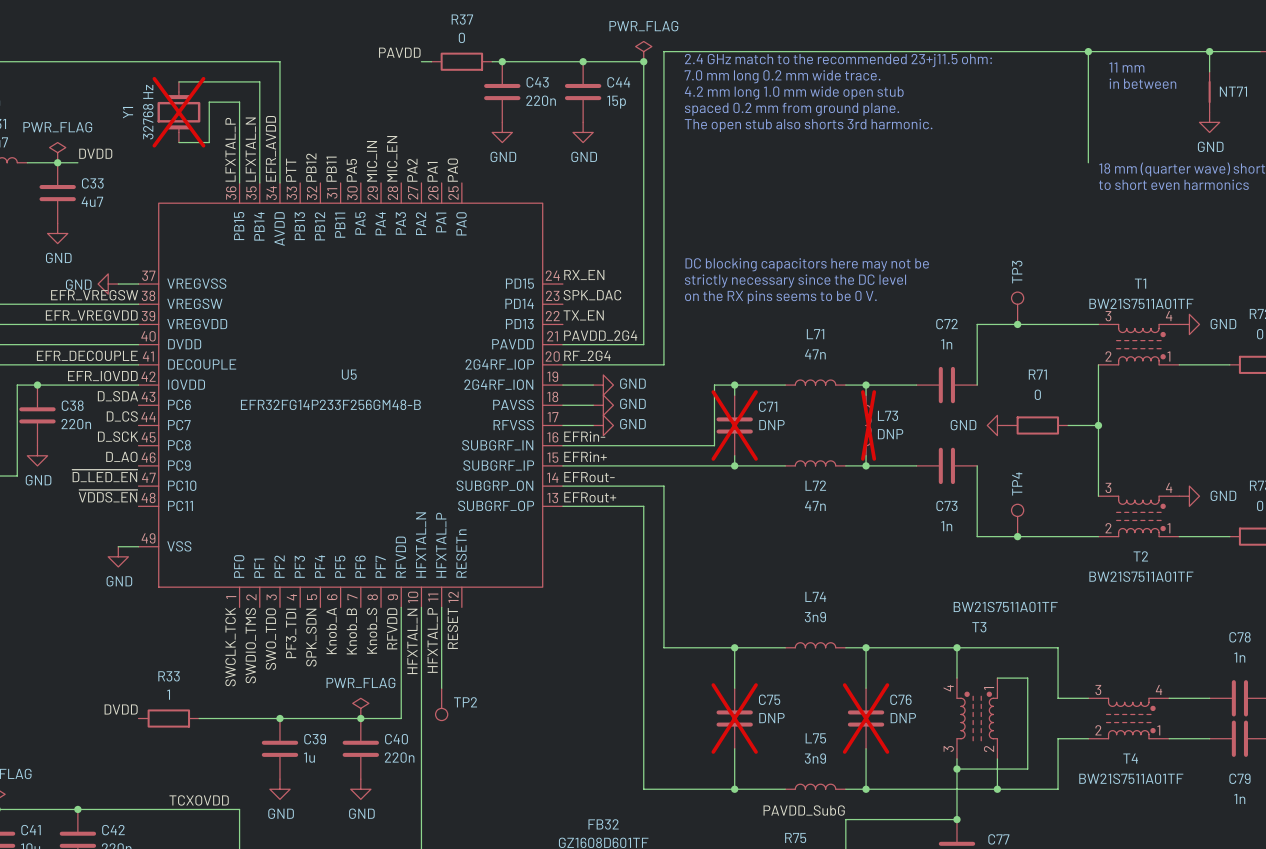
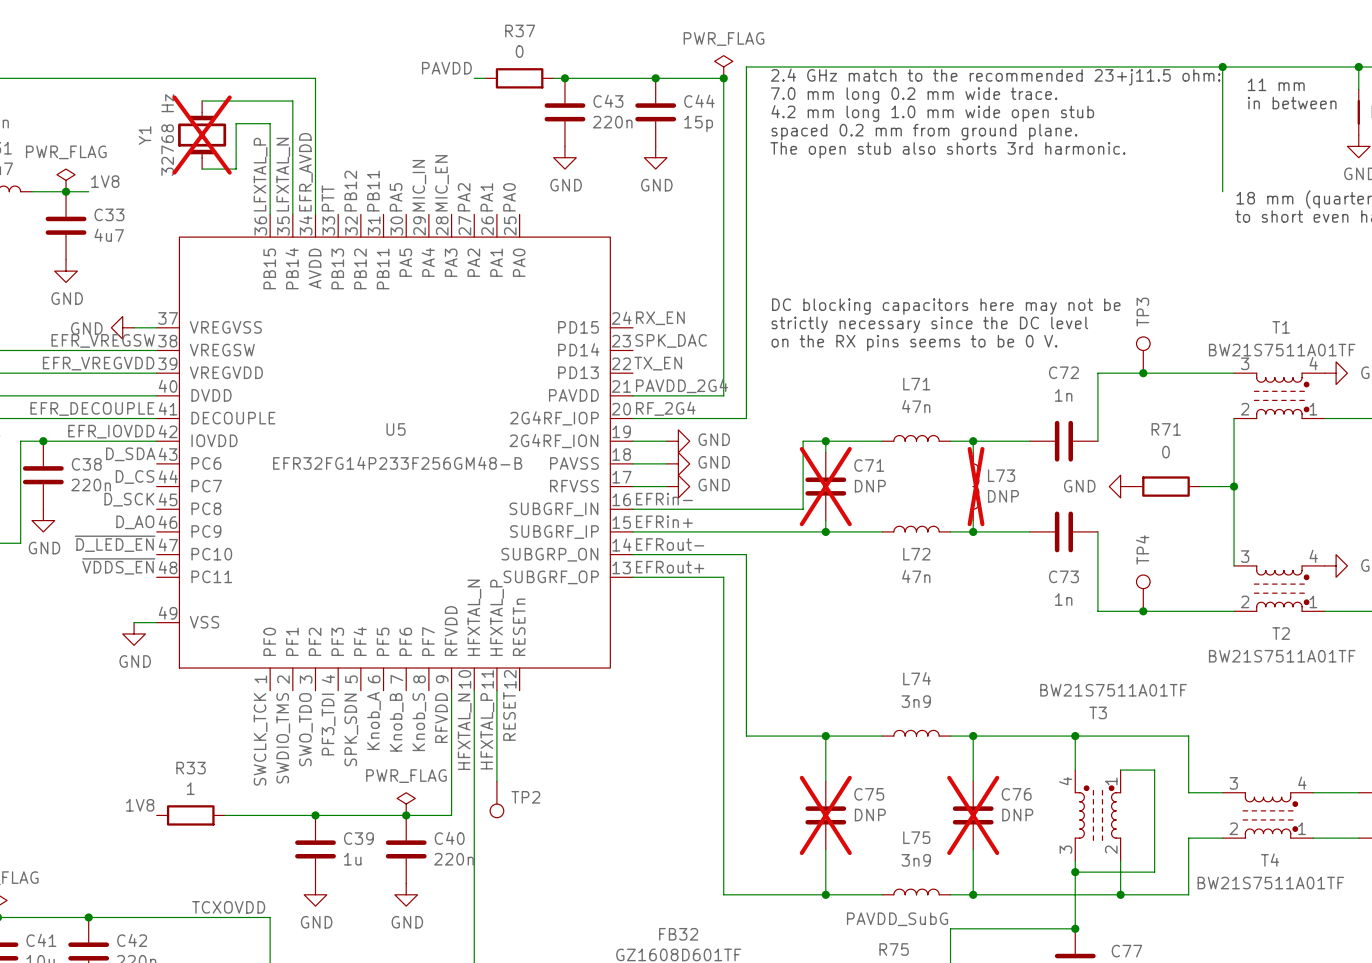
label: DVDD (95, 153) -> 1V8 (105, 181)
label: DVDD (121, 709) -> 1V8 (140, 805)

